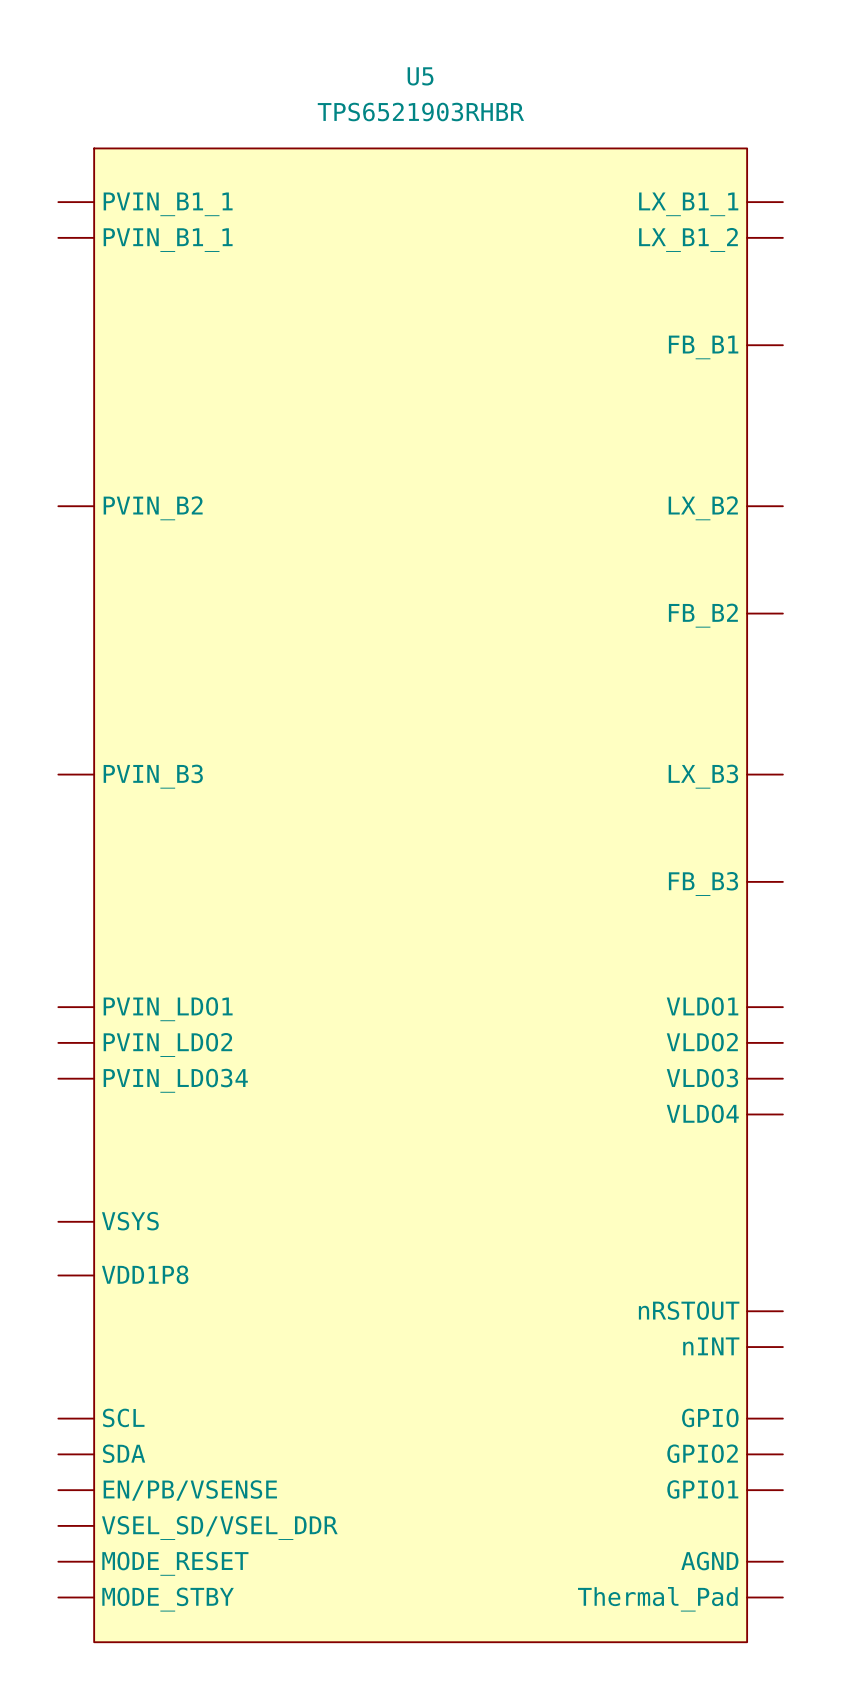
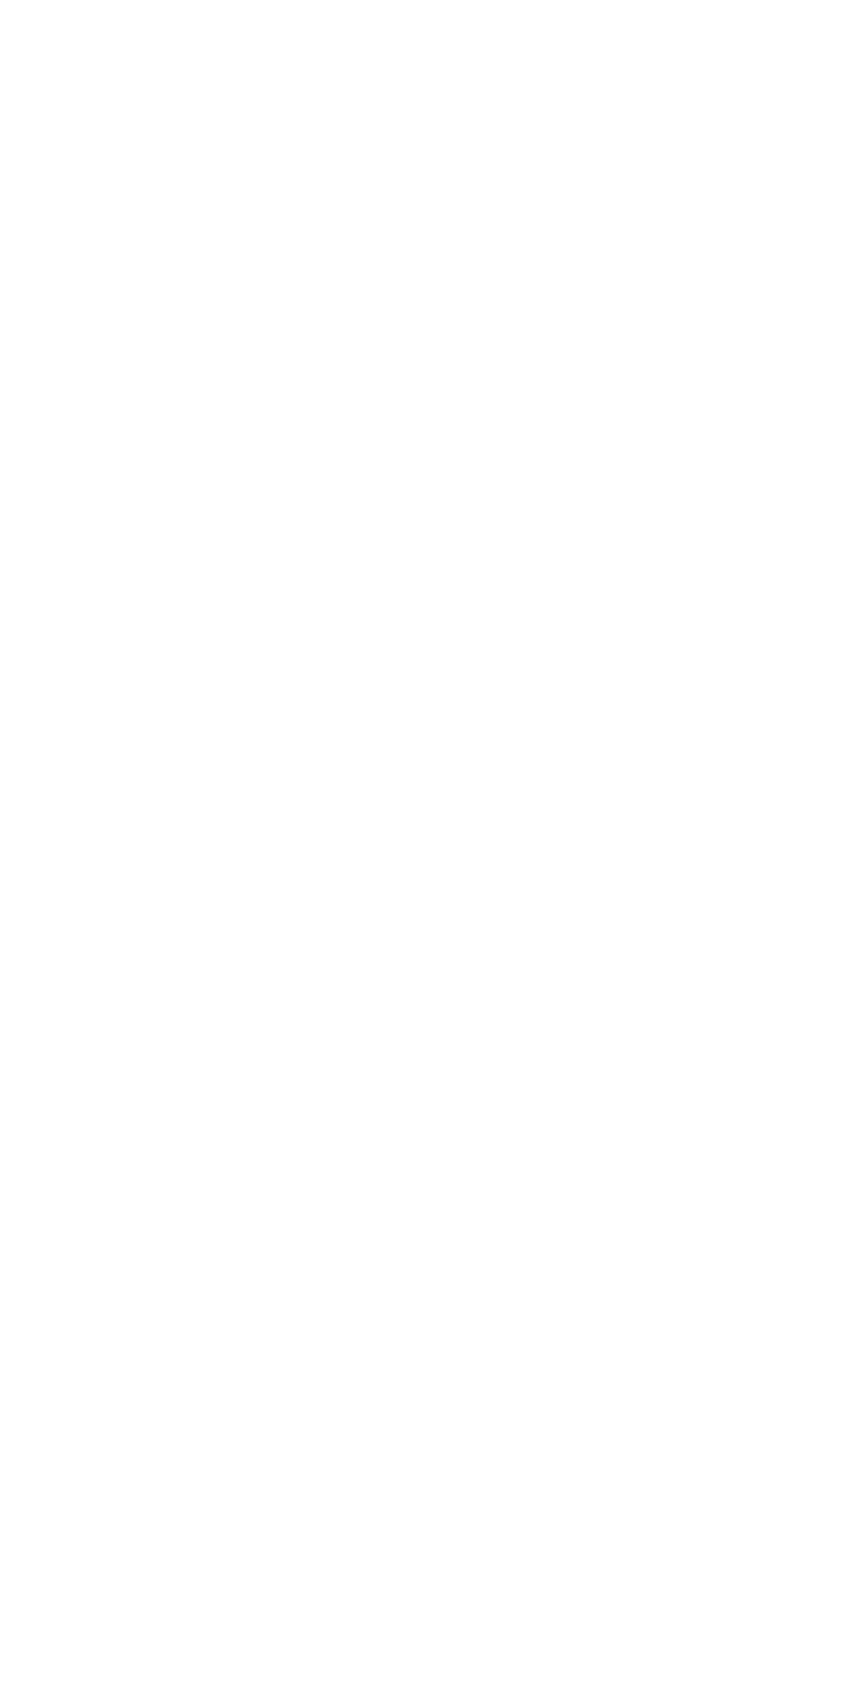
U5: TPS6521903RHBR (420, 895) -> none

